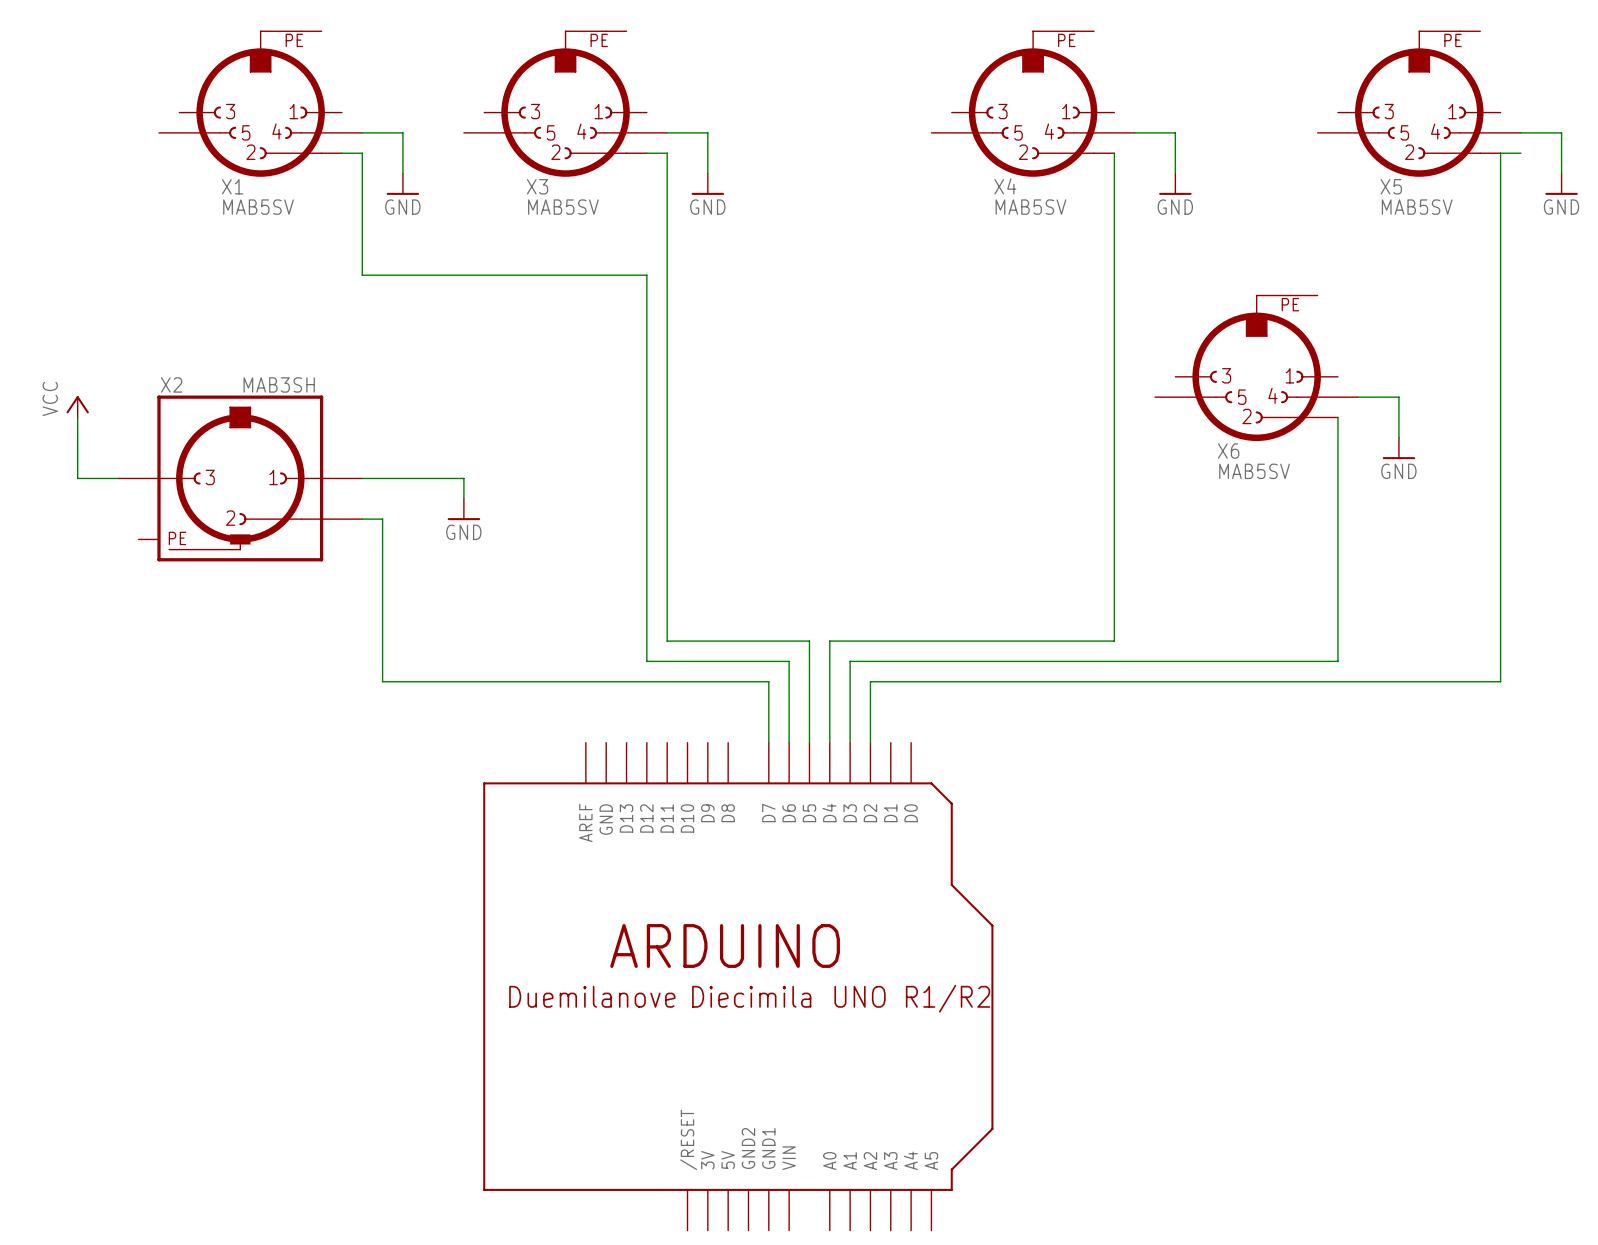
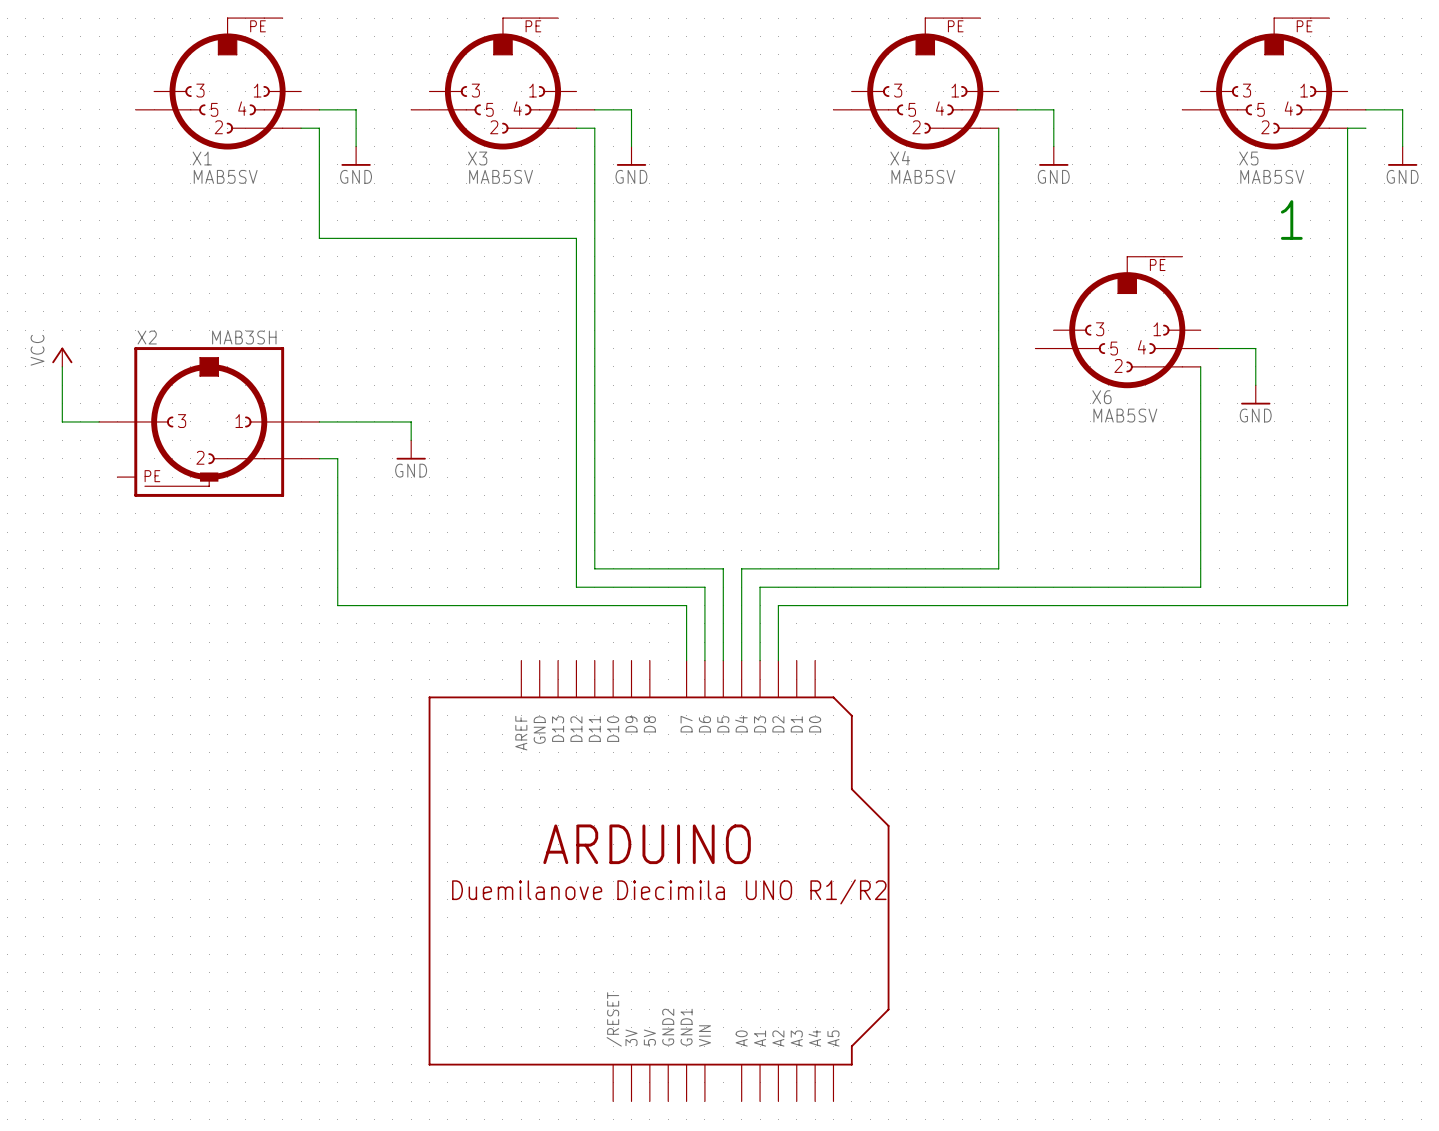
text: none -> 1 (1291, 220)

